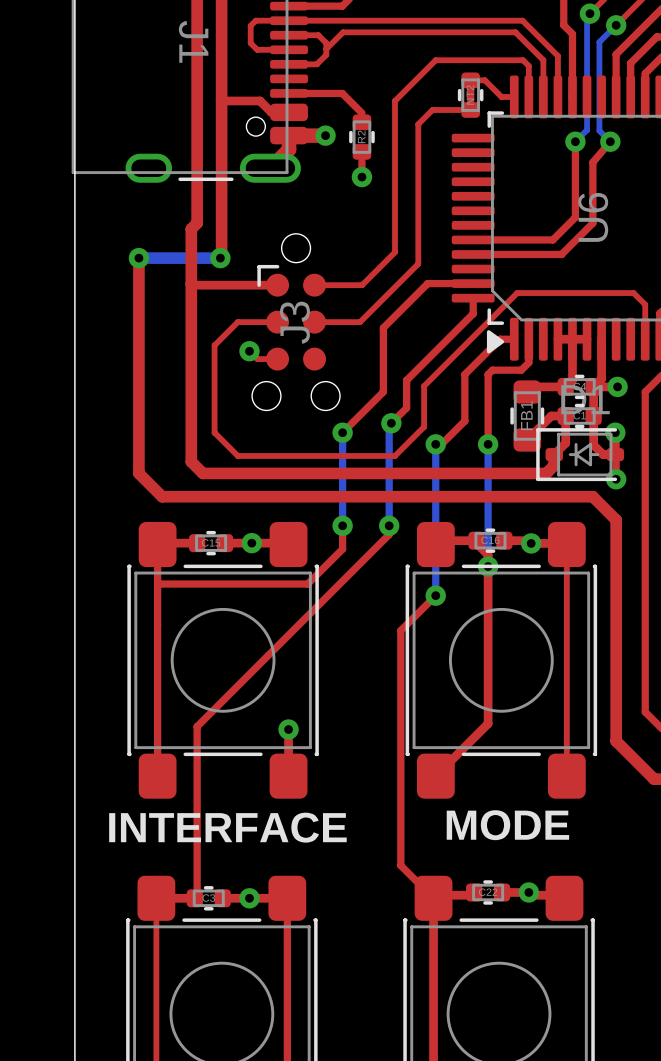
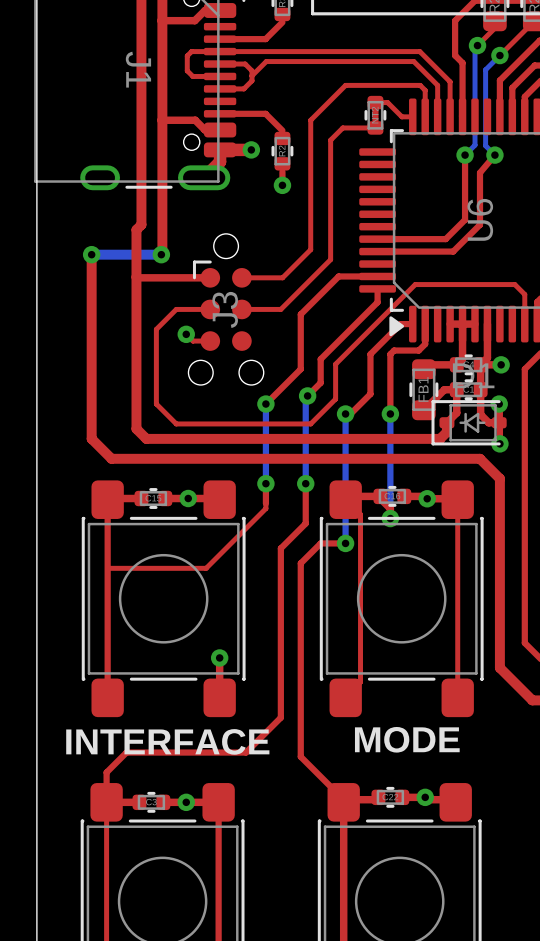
top track: (389, 534) (197, 726) (197, 895) (194, 898) -> (305, 491) (305, 523) (280, 548) (280, 717) (246, 752) (126, 752) (106, 772) (106, 802)
top track: none -> (345, 499) (360, 514) (360, 682)
top track: (342, 549) (307, 584) (157, 584) -> (265, 503) (265, 508) (206, 568) (107, 568)
top track: (488, 566) (488, 723) (435, 775) -> none
top track: none -> (340, 543) (320, 543) (300, 563) (300, 756) (343, 799)
top track: (435, 595) (400, 630) (400, 865) (433, 898) -> none

